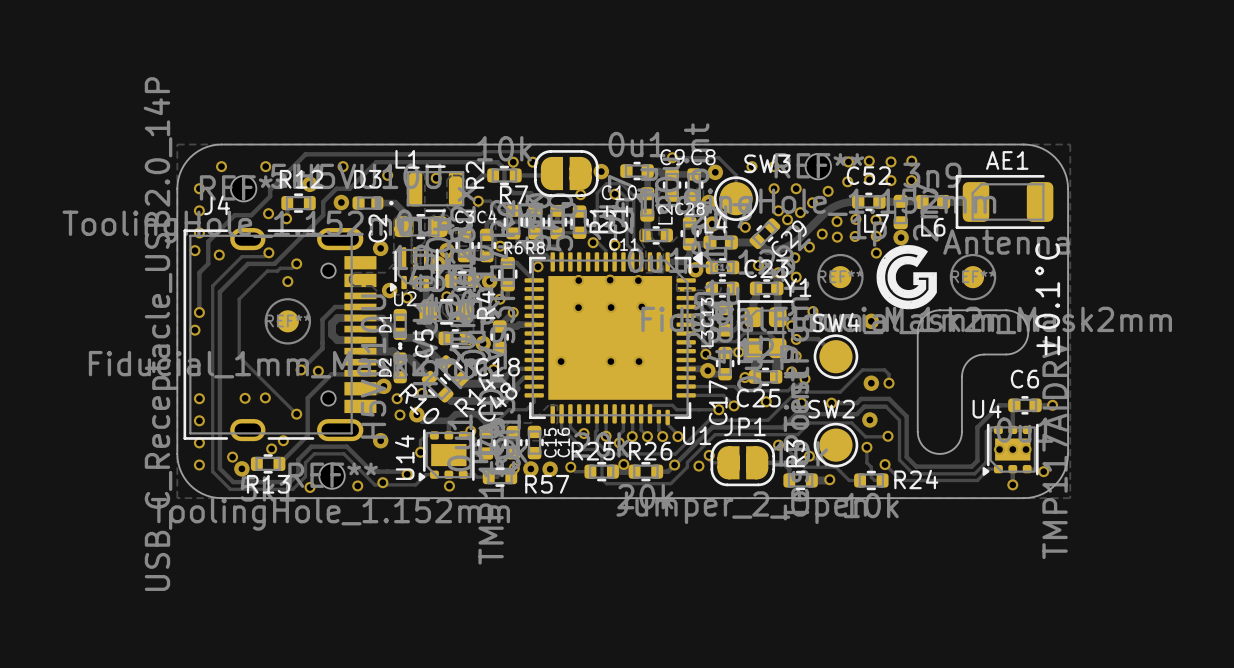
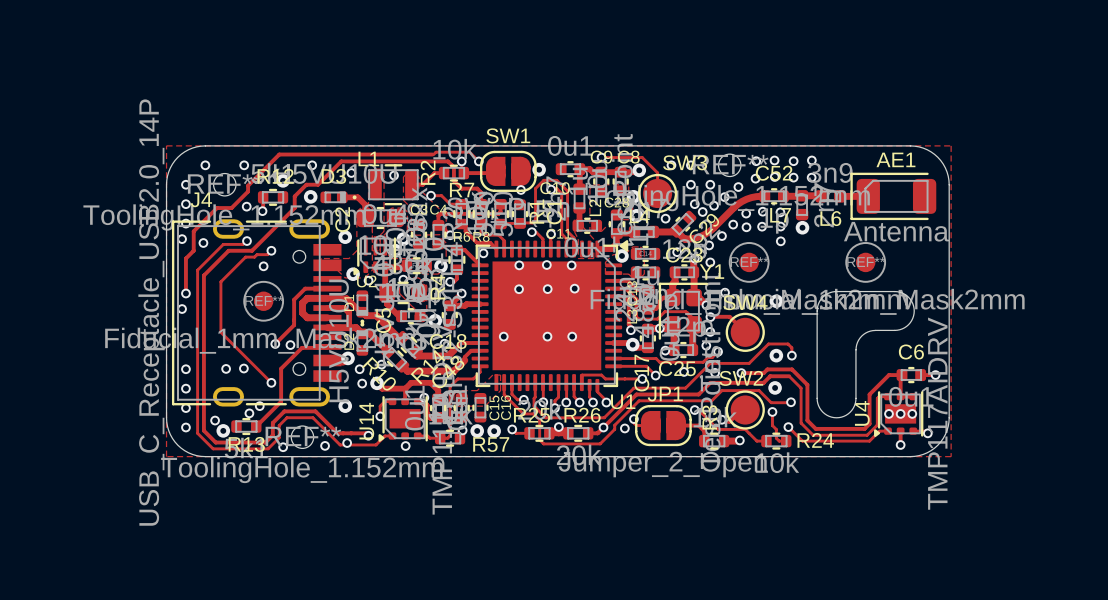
SW1 name: none -> SW1 (508, 135)
drawing: [876, 245, 937, 310] -> none
text: ±0.1°C (1047, 299) -> none
U4 name rotation: 0° (987, 408) -> 90° counterclockwise (862, 413)
U4 name position: U4 (987, 408) -> U4 (862, 413)

